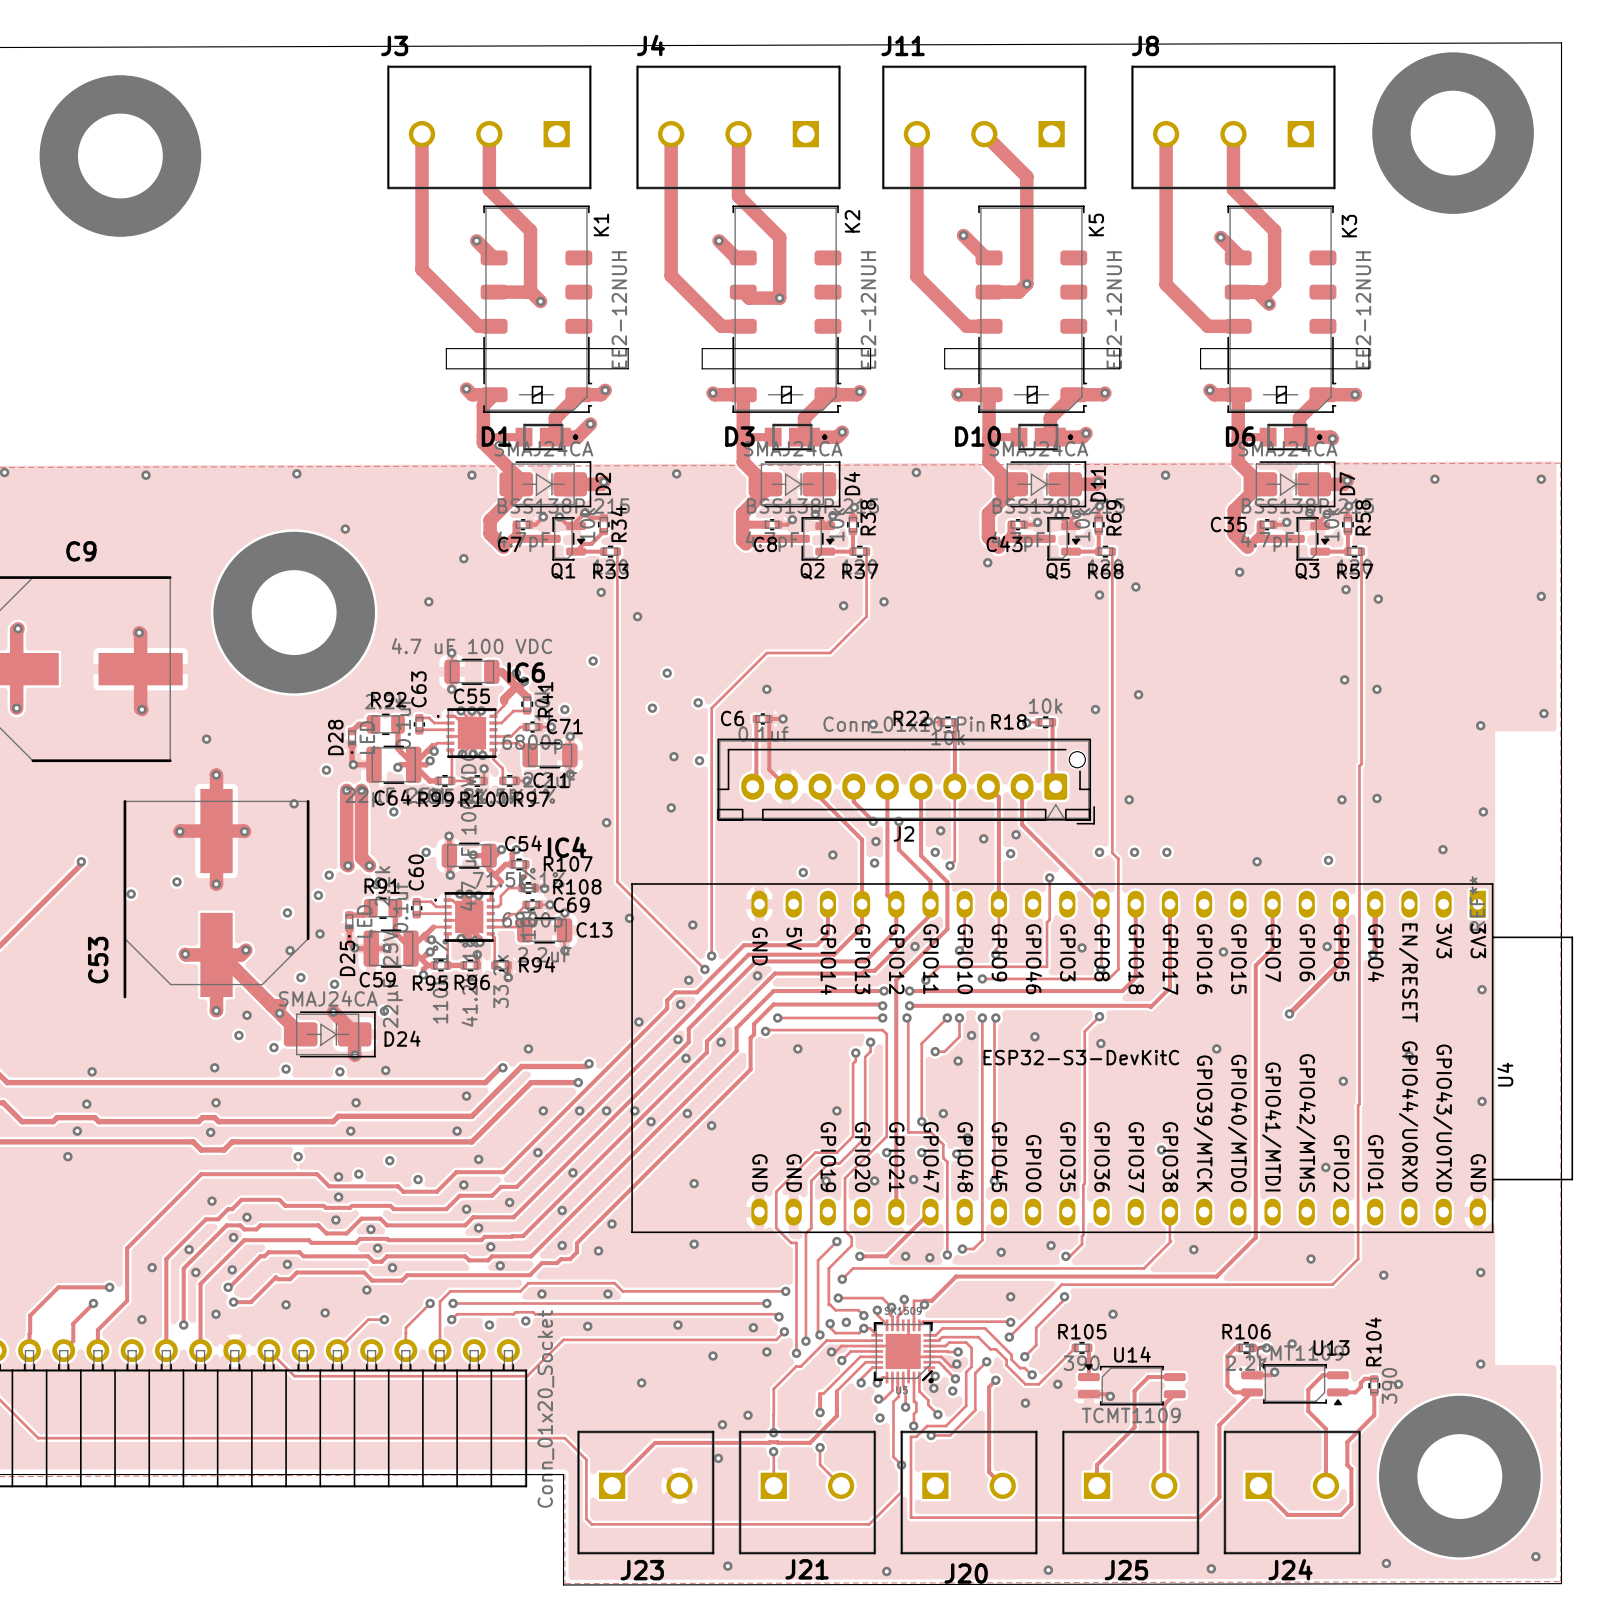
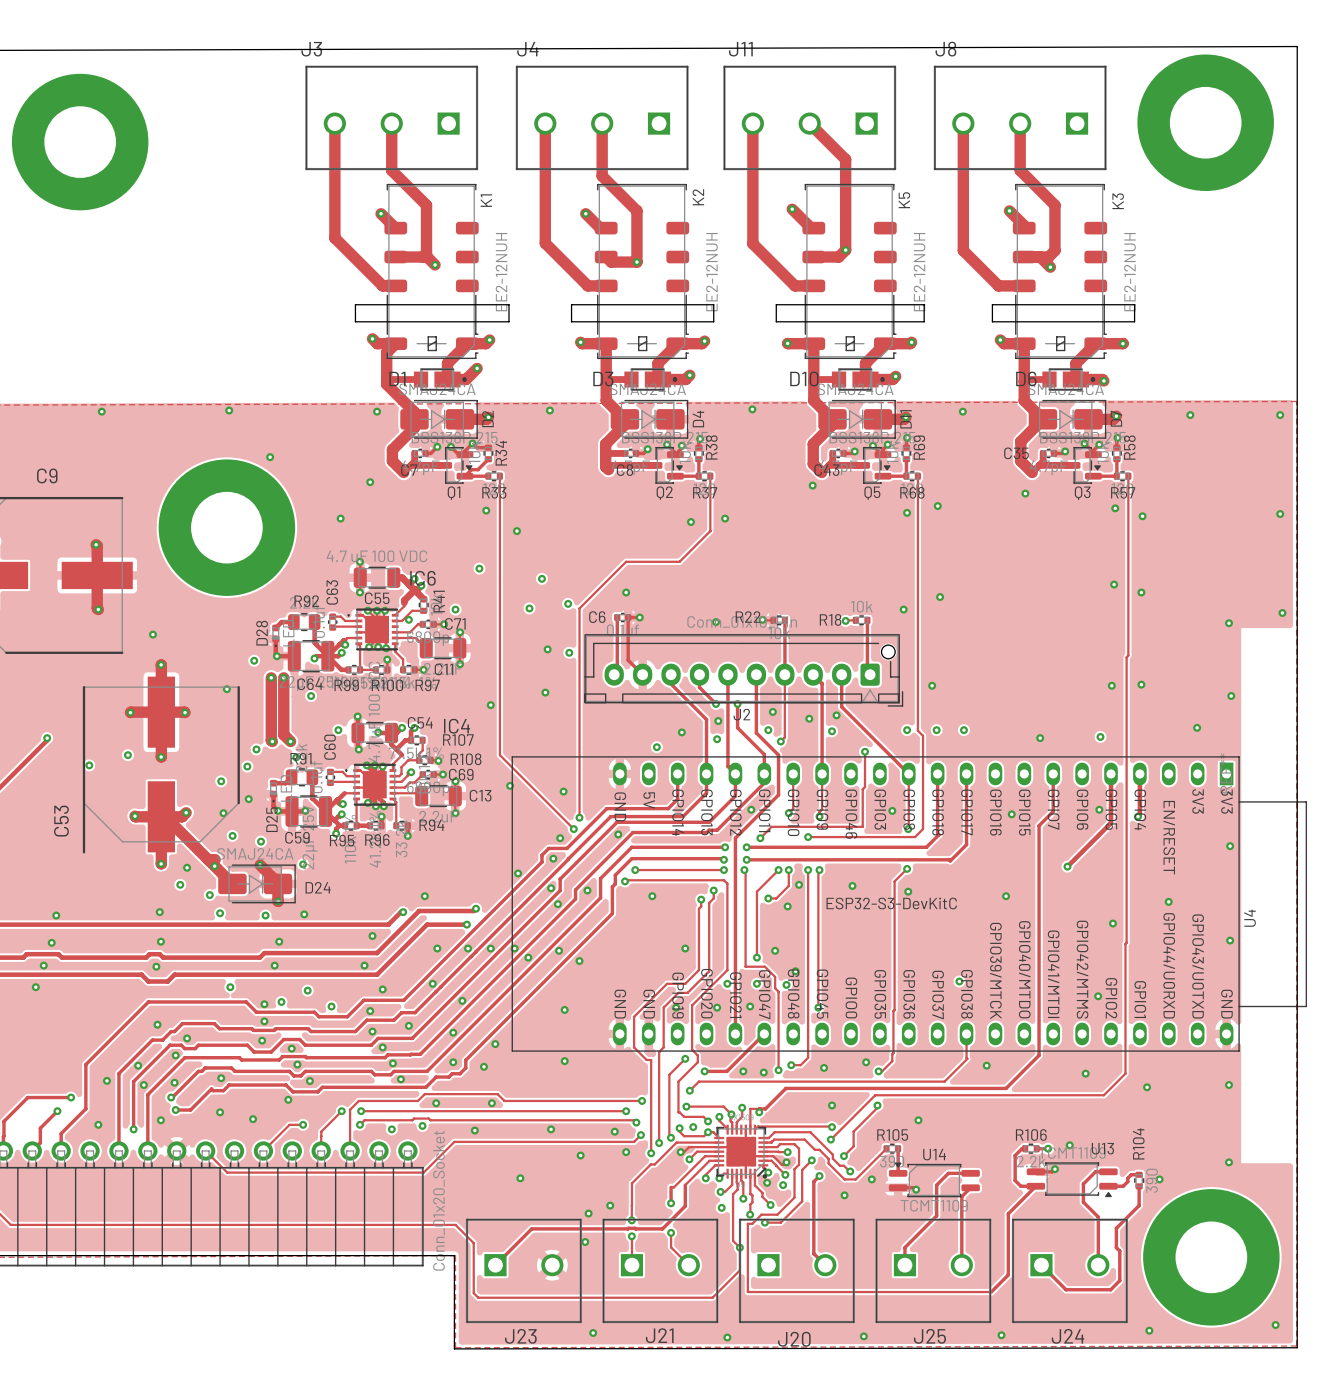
via: none -> (408, 619)
track: none -> (411, 772) (407, 772) (407, 775) (401, 781) (392, 781)
via: none -> (411, 772)

